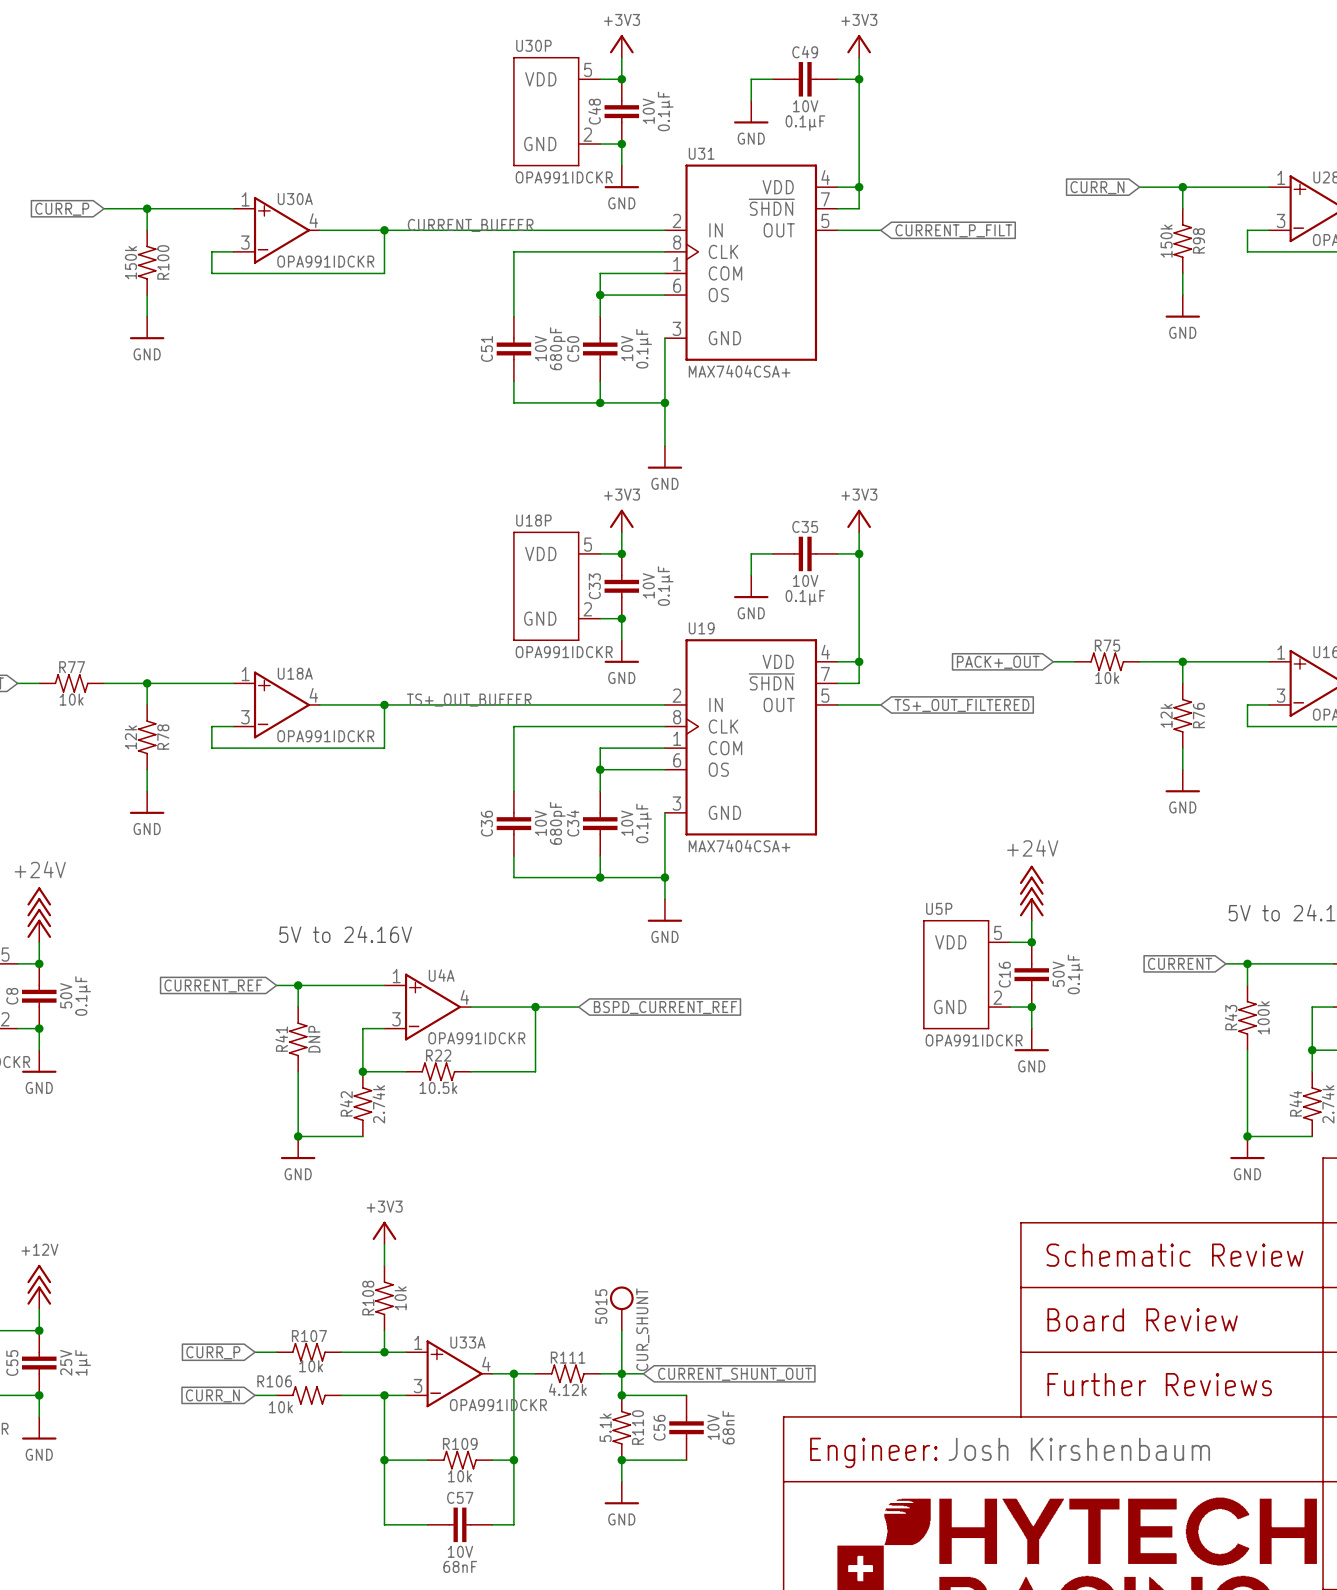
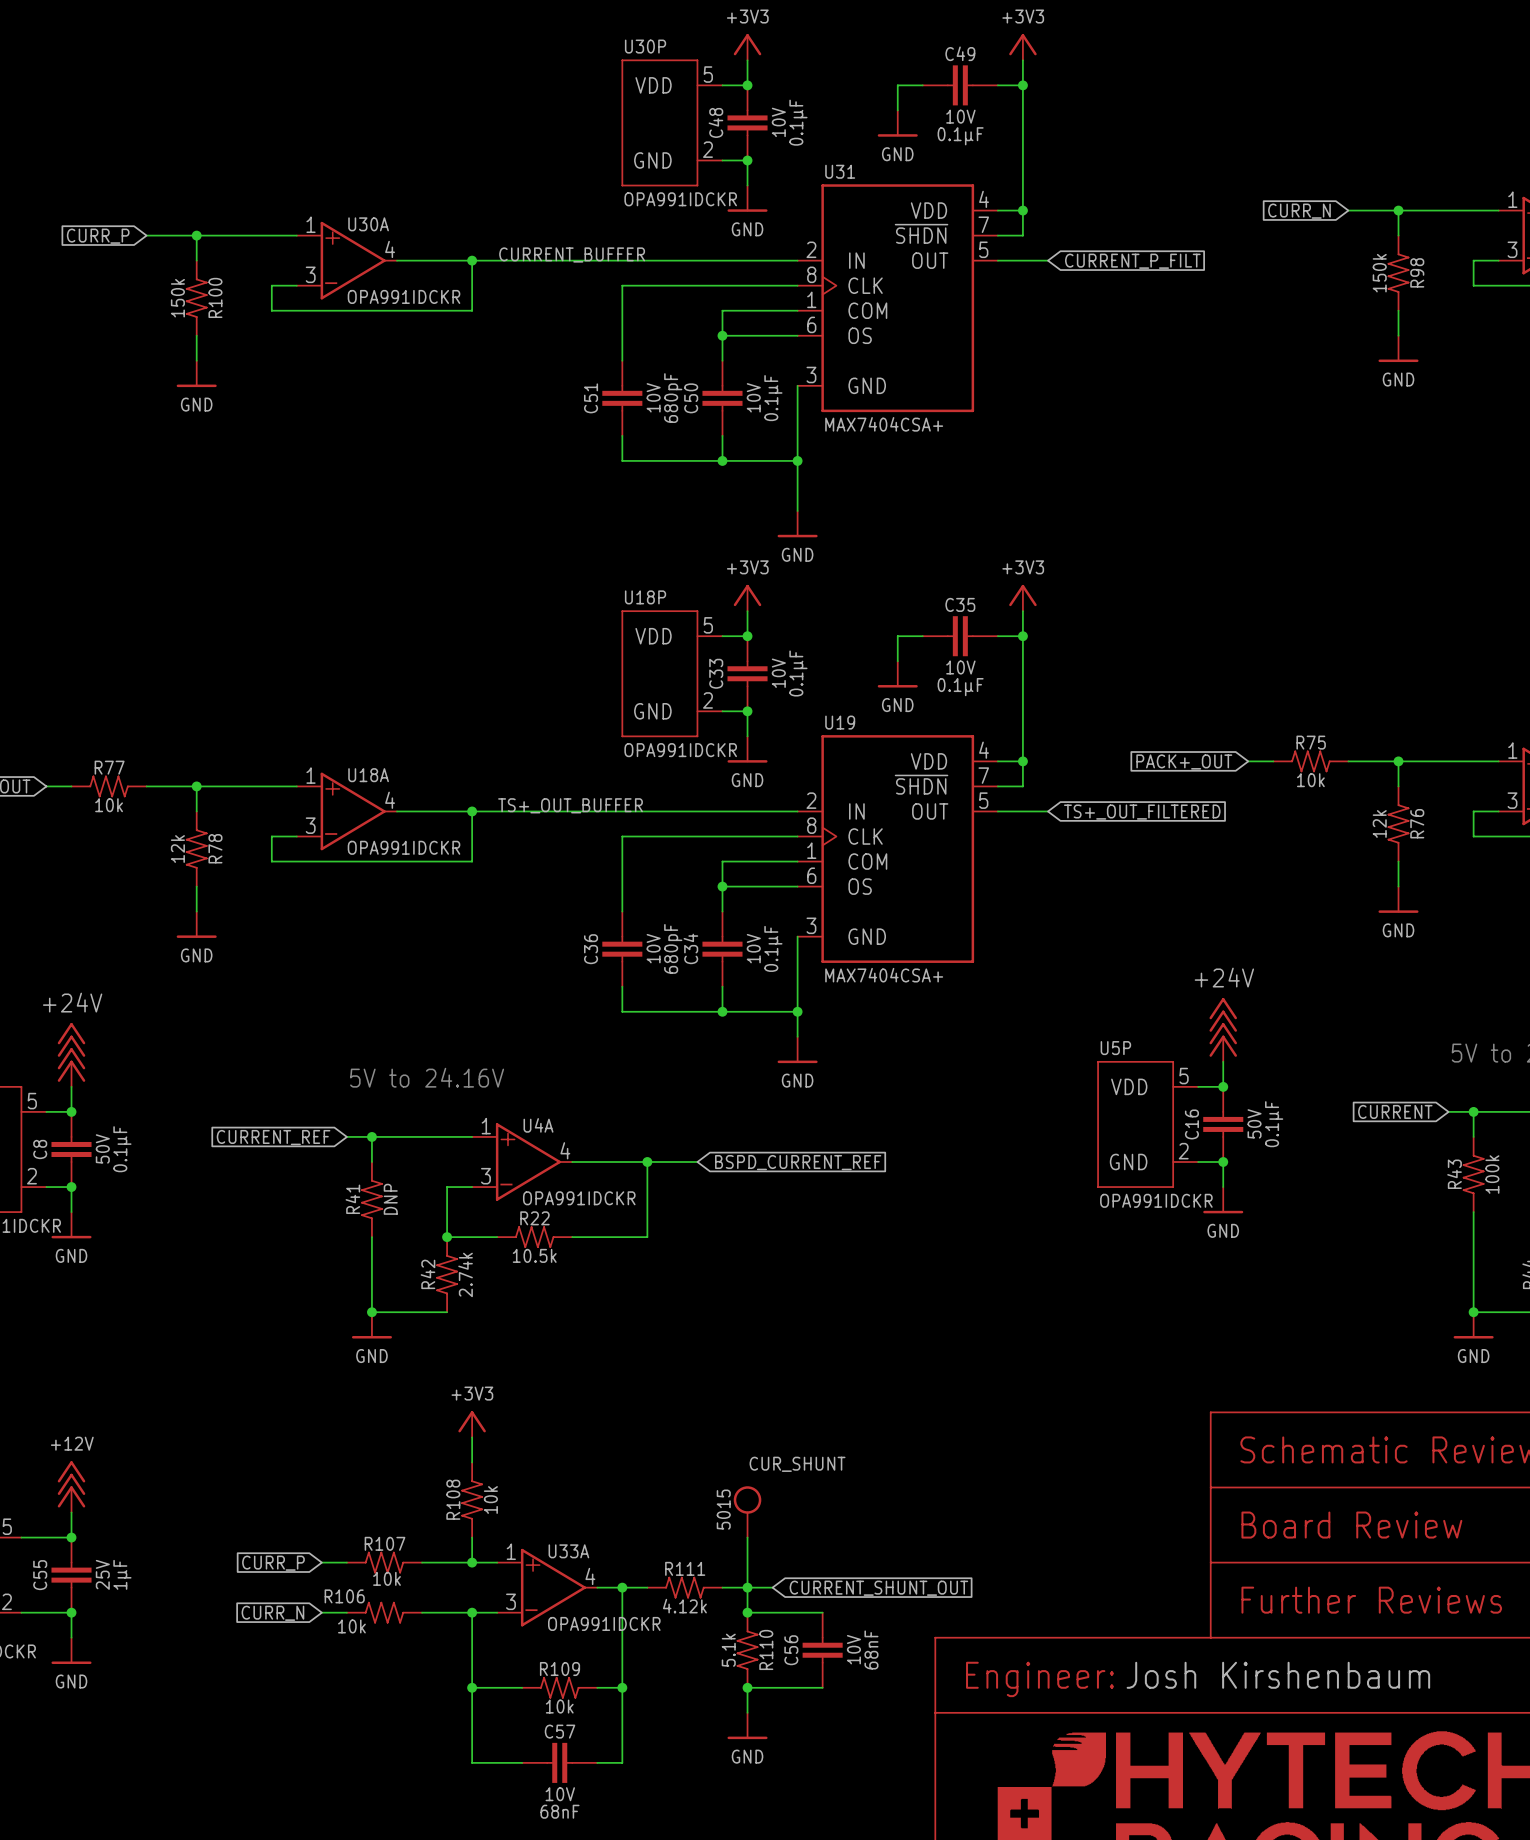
CUR_SHUNT name rotation: 0° (642, 1329) -> 90° clockwise (797, 1464)

